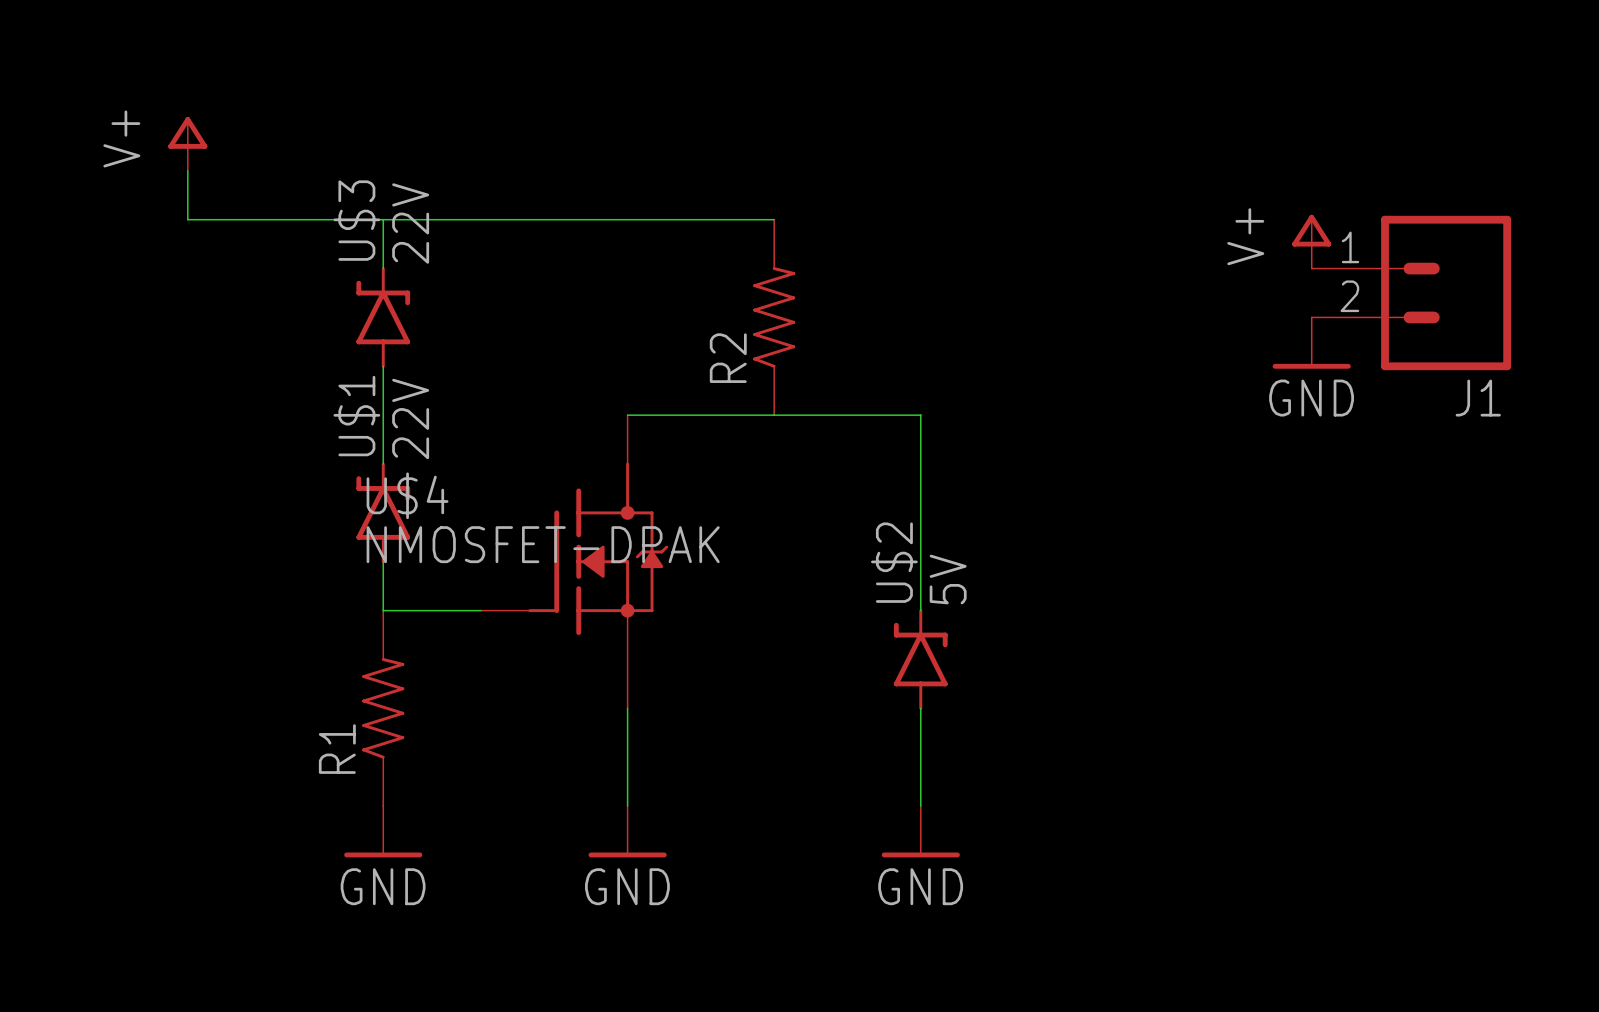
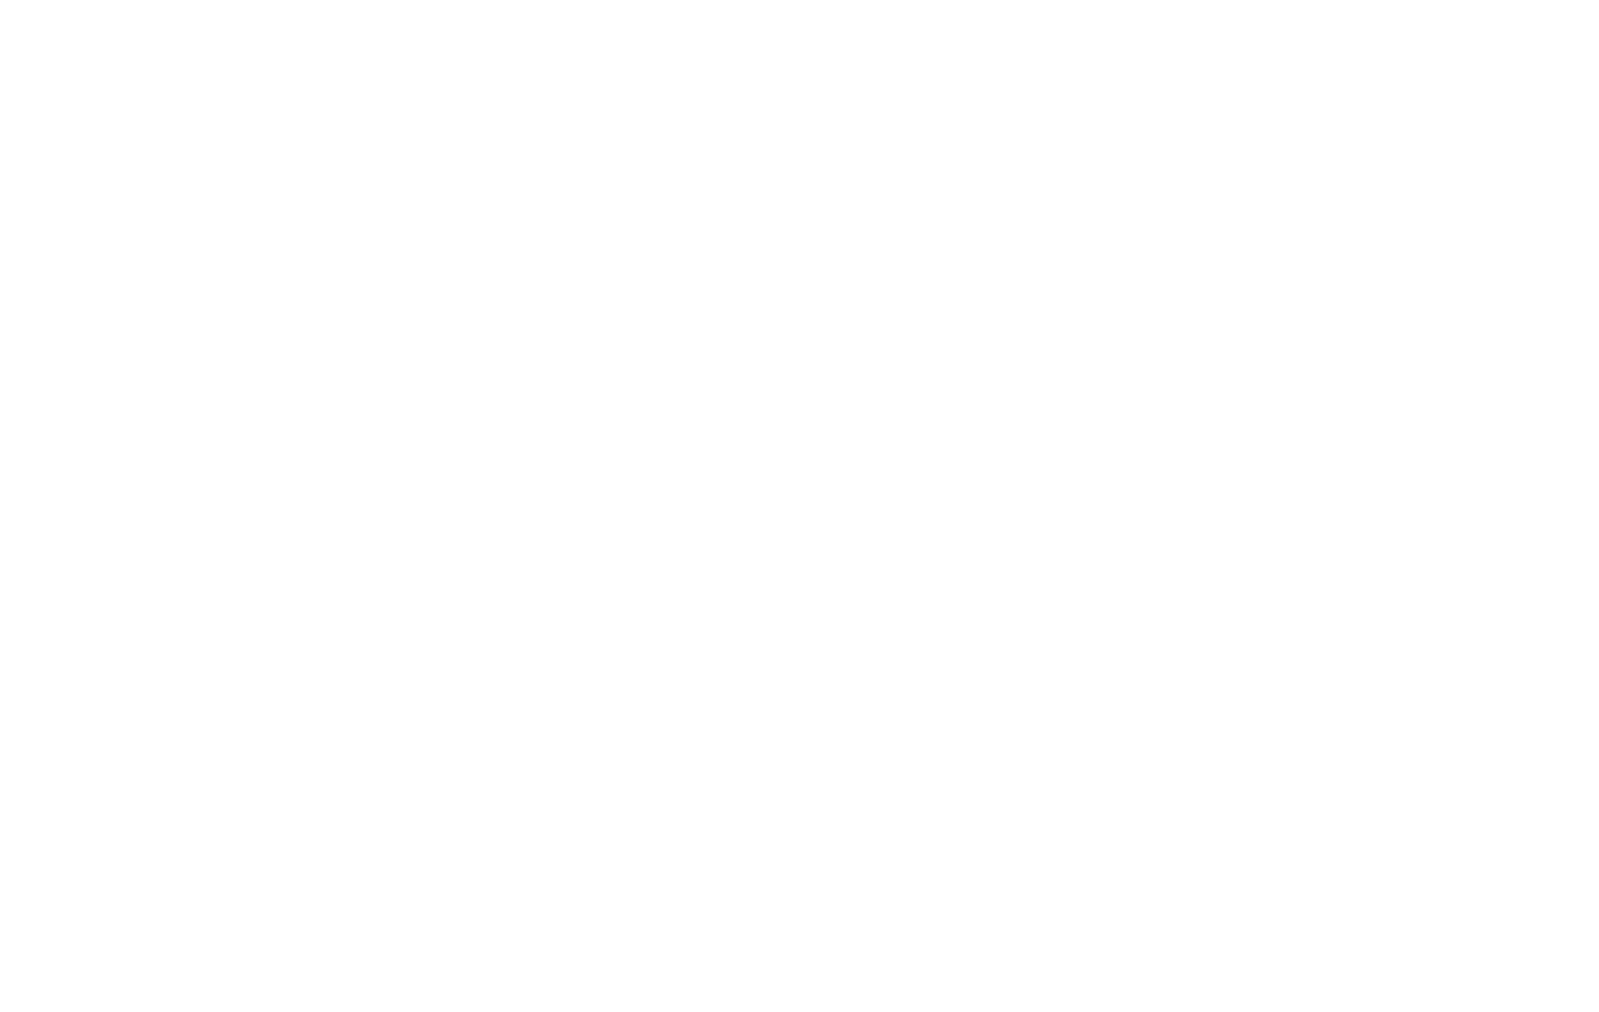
power symbol: V+ (187, 143) -> none
wire: (187, 170) (187, 219) (774, 219) -> none
wire: (383, 219) (383, 268) -> none
power symbol: V+ (1311, 241) -> none
J1: (1411, 292) -> none
U$3: 22V (383, 317) -> none
R2: (774, 317) -> none
power symbol: GND (1311, 343) -> none
wire: (383, 366) (383, 464) -> none
wire: (627, 415) (920, 415) (920, 610) -> none
U$1: 22V (383, 512) -> none
wire: (383, 561) (383, 610) (481, 610) -> none
U$4: NMOSFET-DPAK (574, 561) -> none
U$2: 5V (920, 659) -> none
R1: (383, 708) -> none
wire: (627, 708) (627, 806) -> none
wire: (920, 708) (920, 806) -> none
power symbol: GND (383, 831) -> none
power symbol: GND (627, 831) -> none
power symbol: GND (920, 831) -> none

